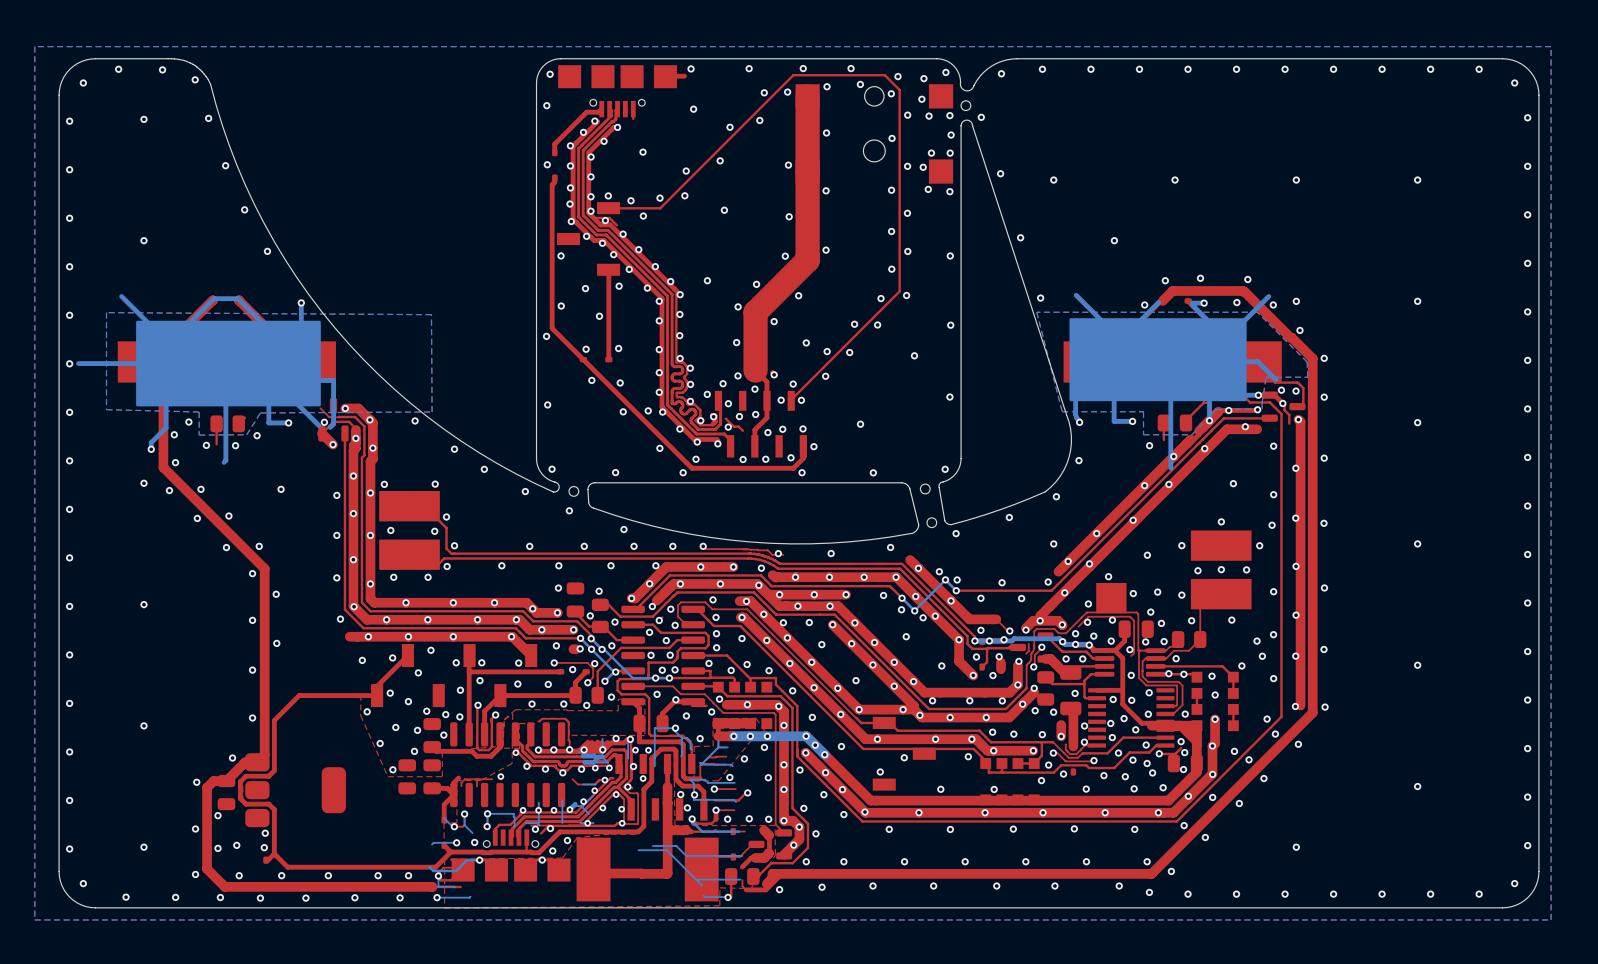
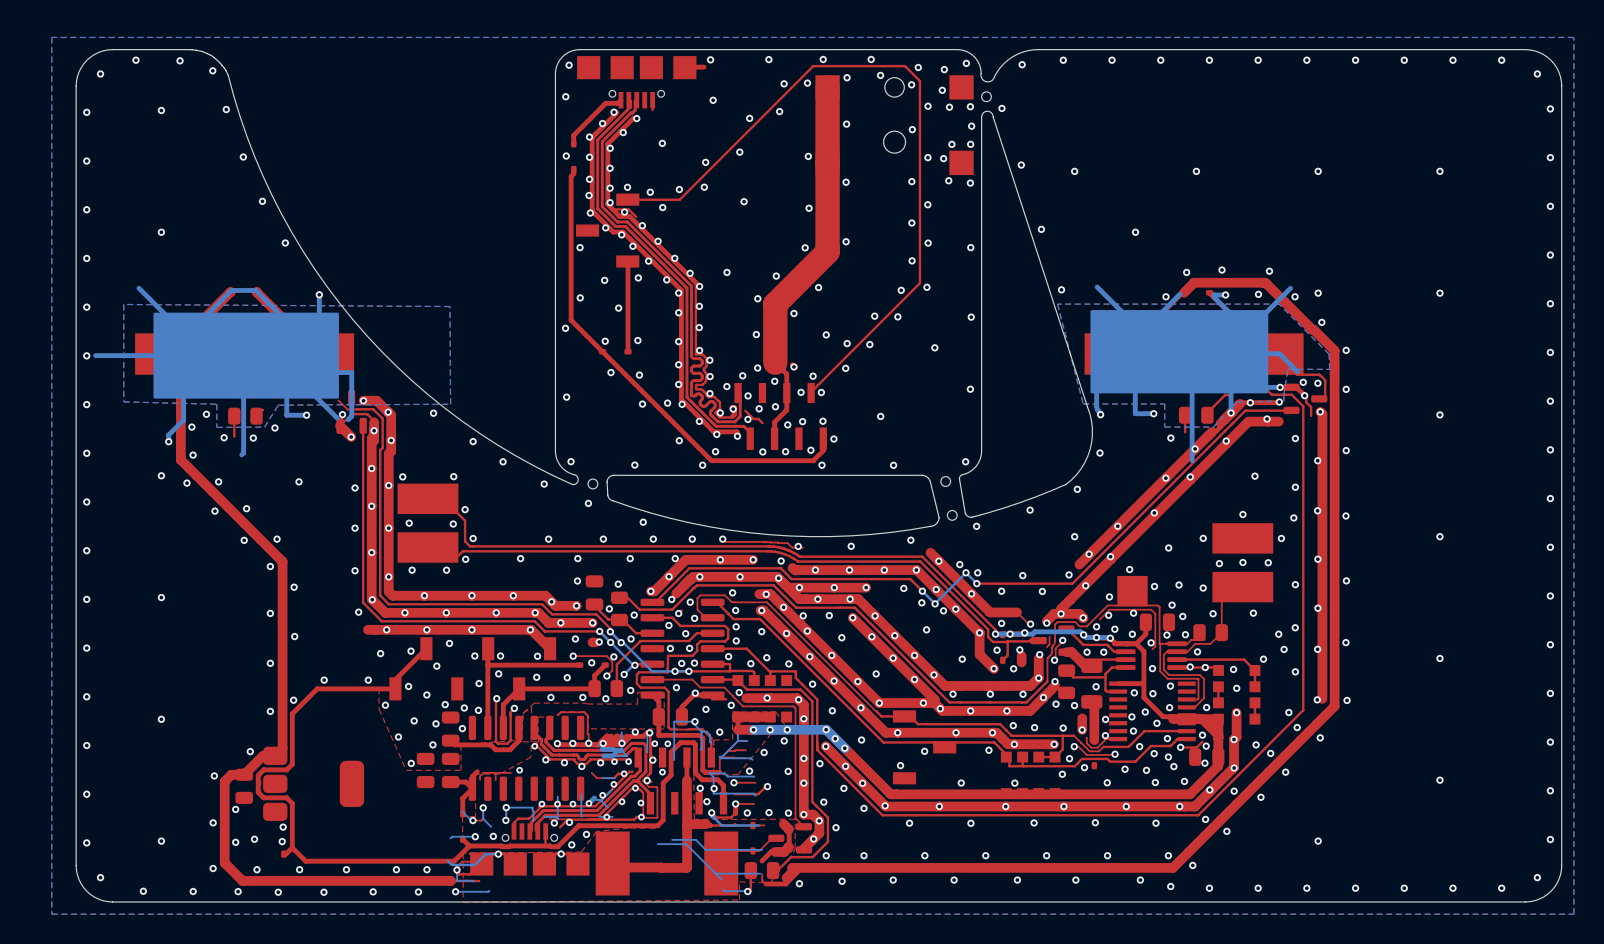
via: none -> (324, 680)
via: none -> (368, 680)
via: none -> (293, 700)

